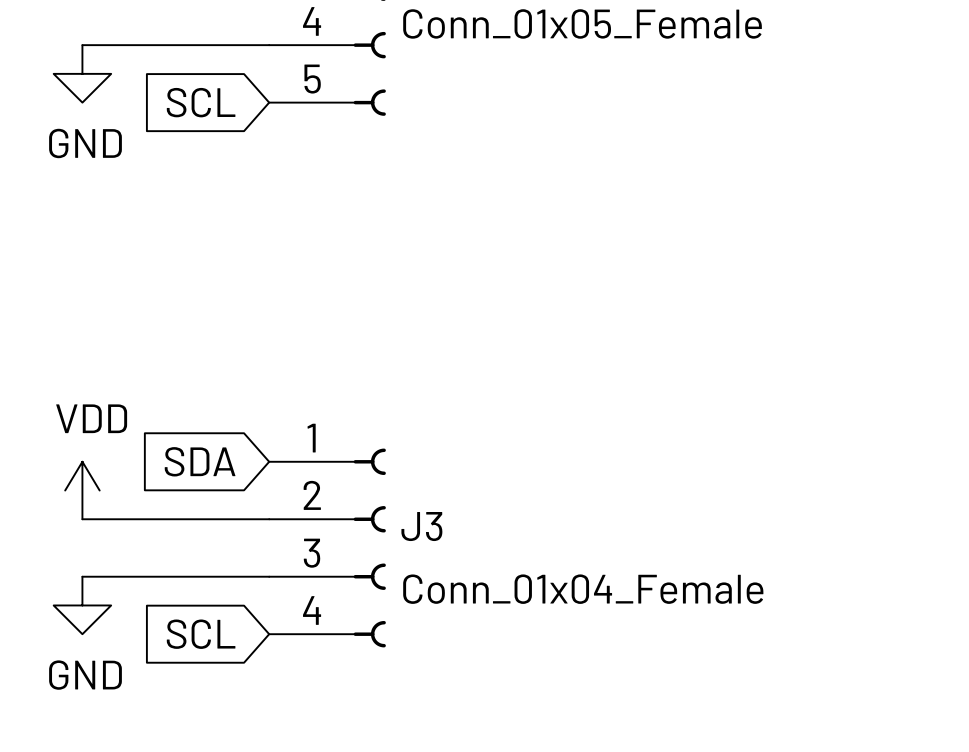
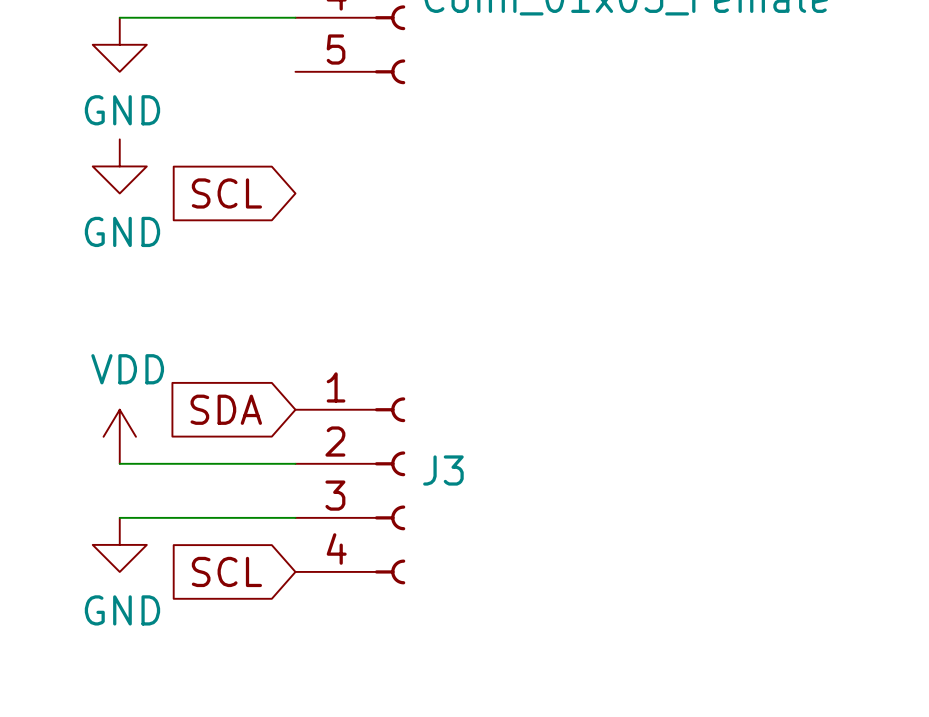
global label position: SCL (201, 102) -> SCL (226, 193)
power symbol: none -> GND (119, 166)
J3 value: Conn_01x04_Female (583, 589) -> none

